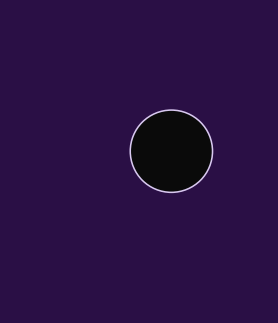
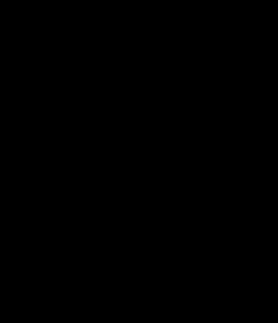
part: (171, 151) -> none

